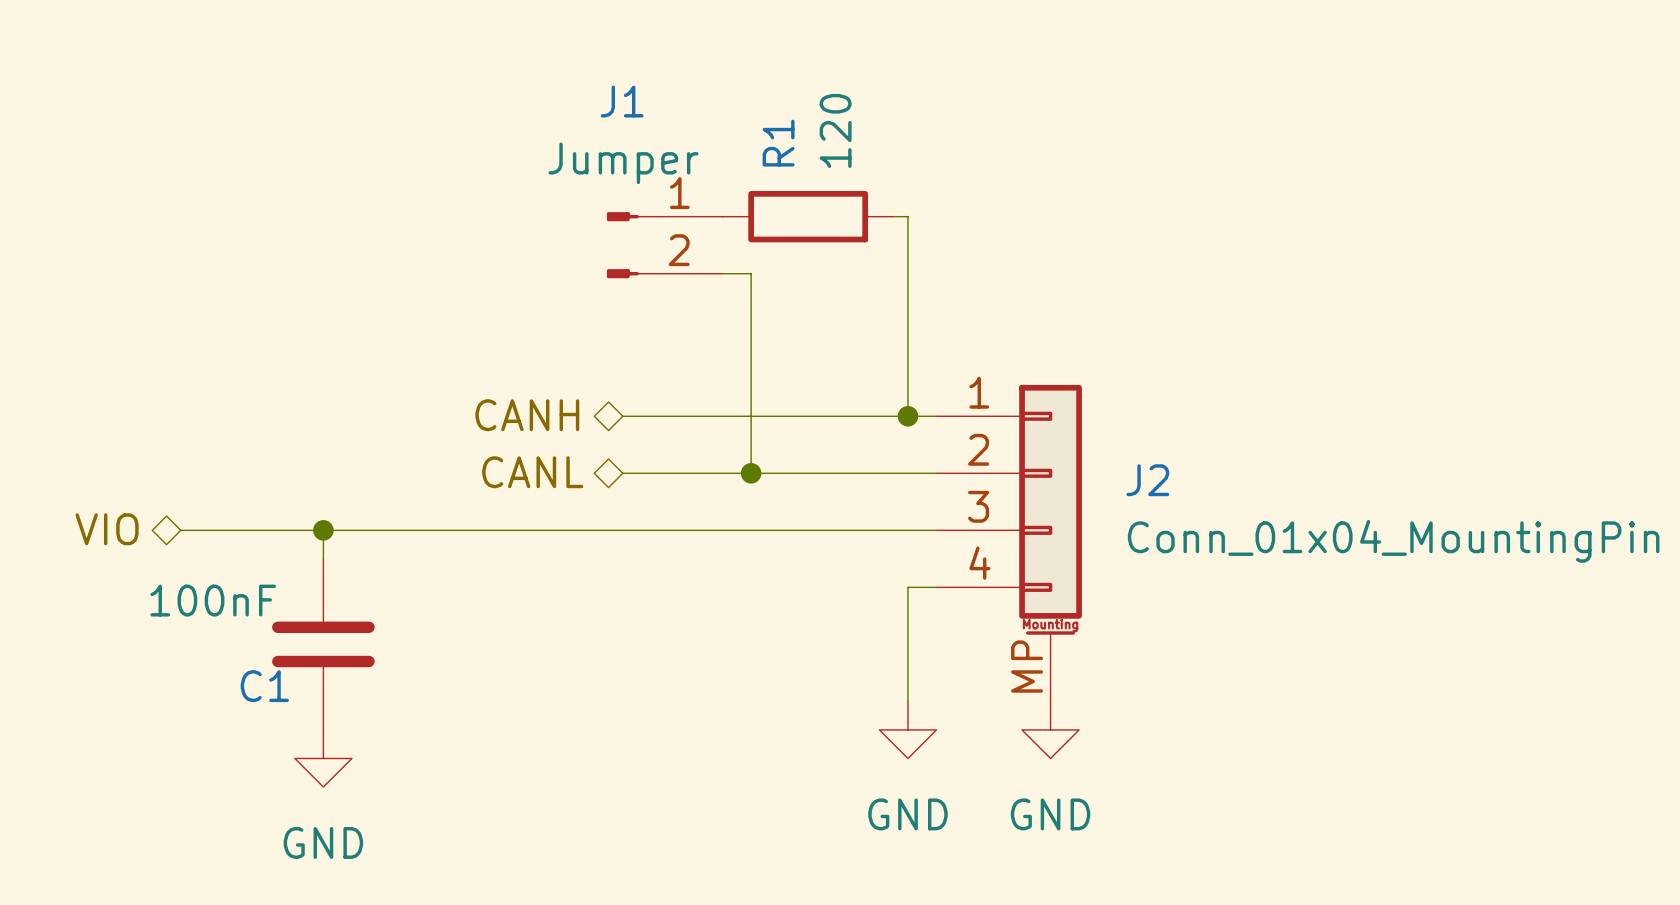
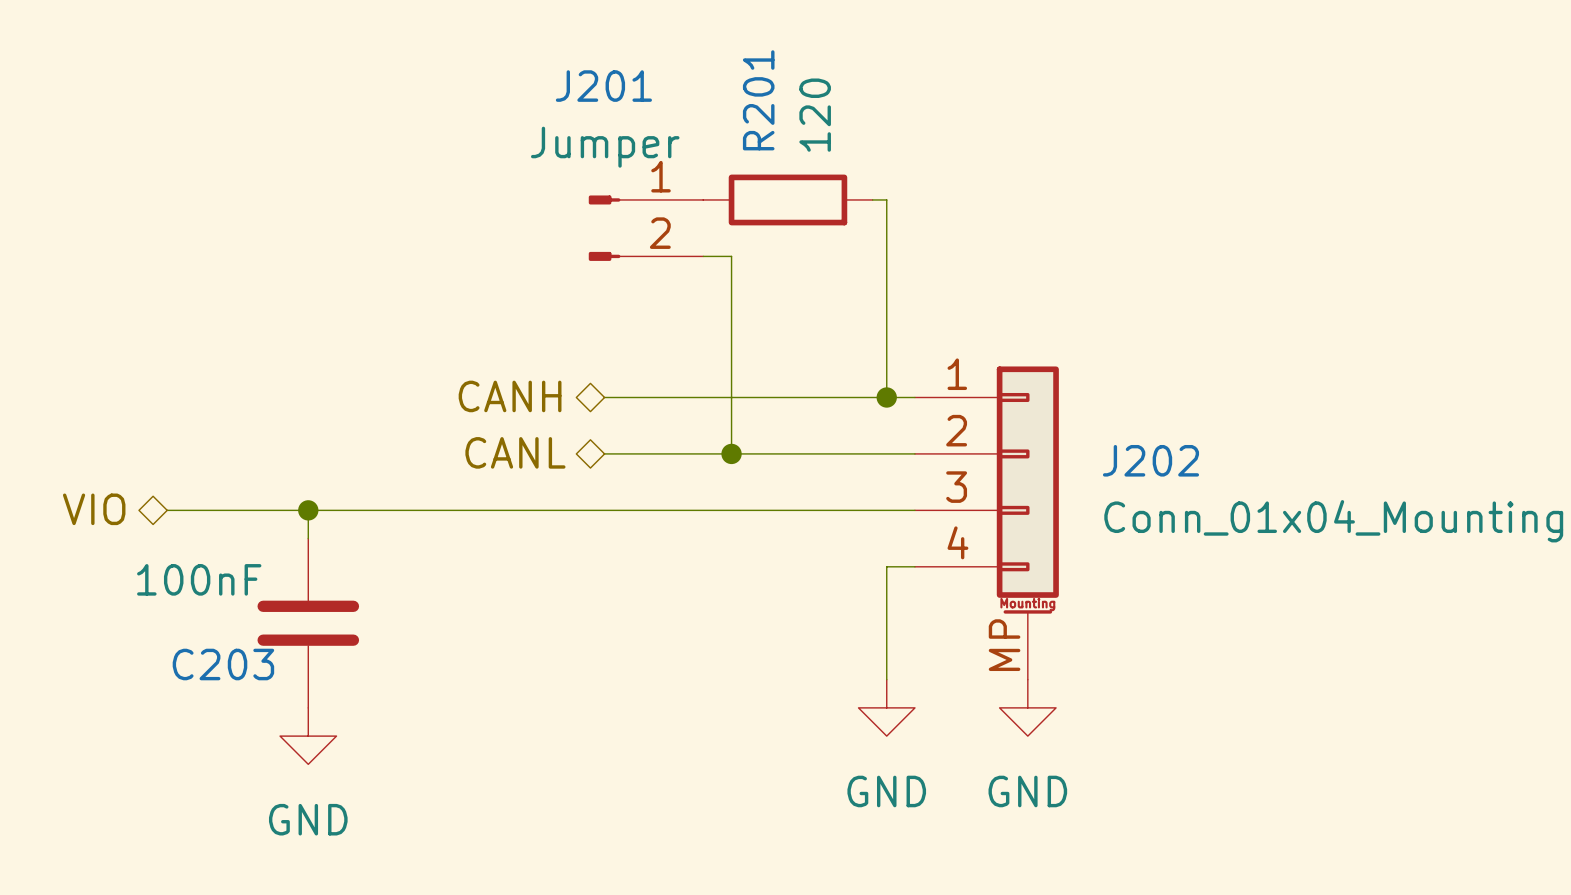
J1 name: J1 (622, 101) -> J201 (603, 86)
R1 name: R1 (778, 143) -> R201 (758, 100)
J2 name: J2 (1147, 480) -> J202 (1150, 460)
C1 name: C1 (264, 686) -> C203 (223, 664)

